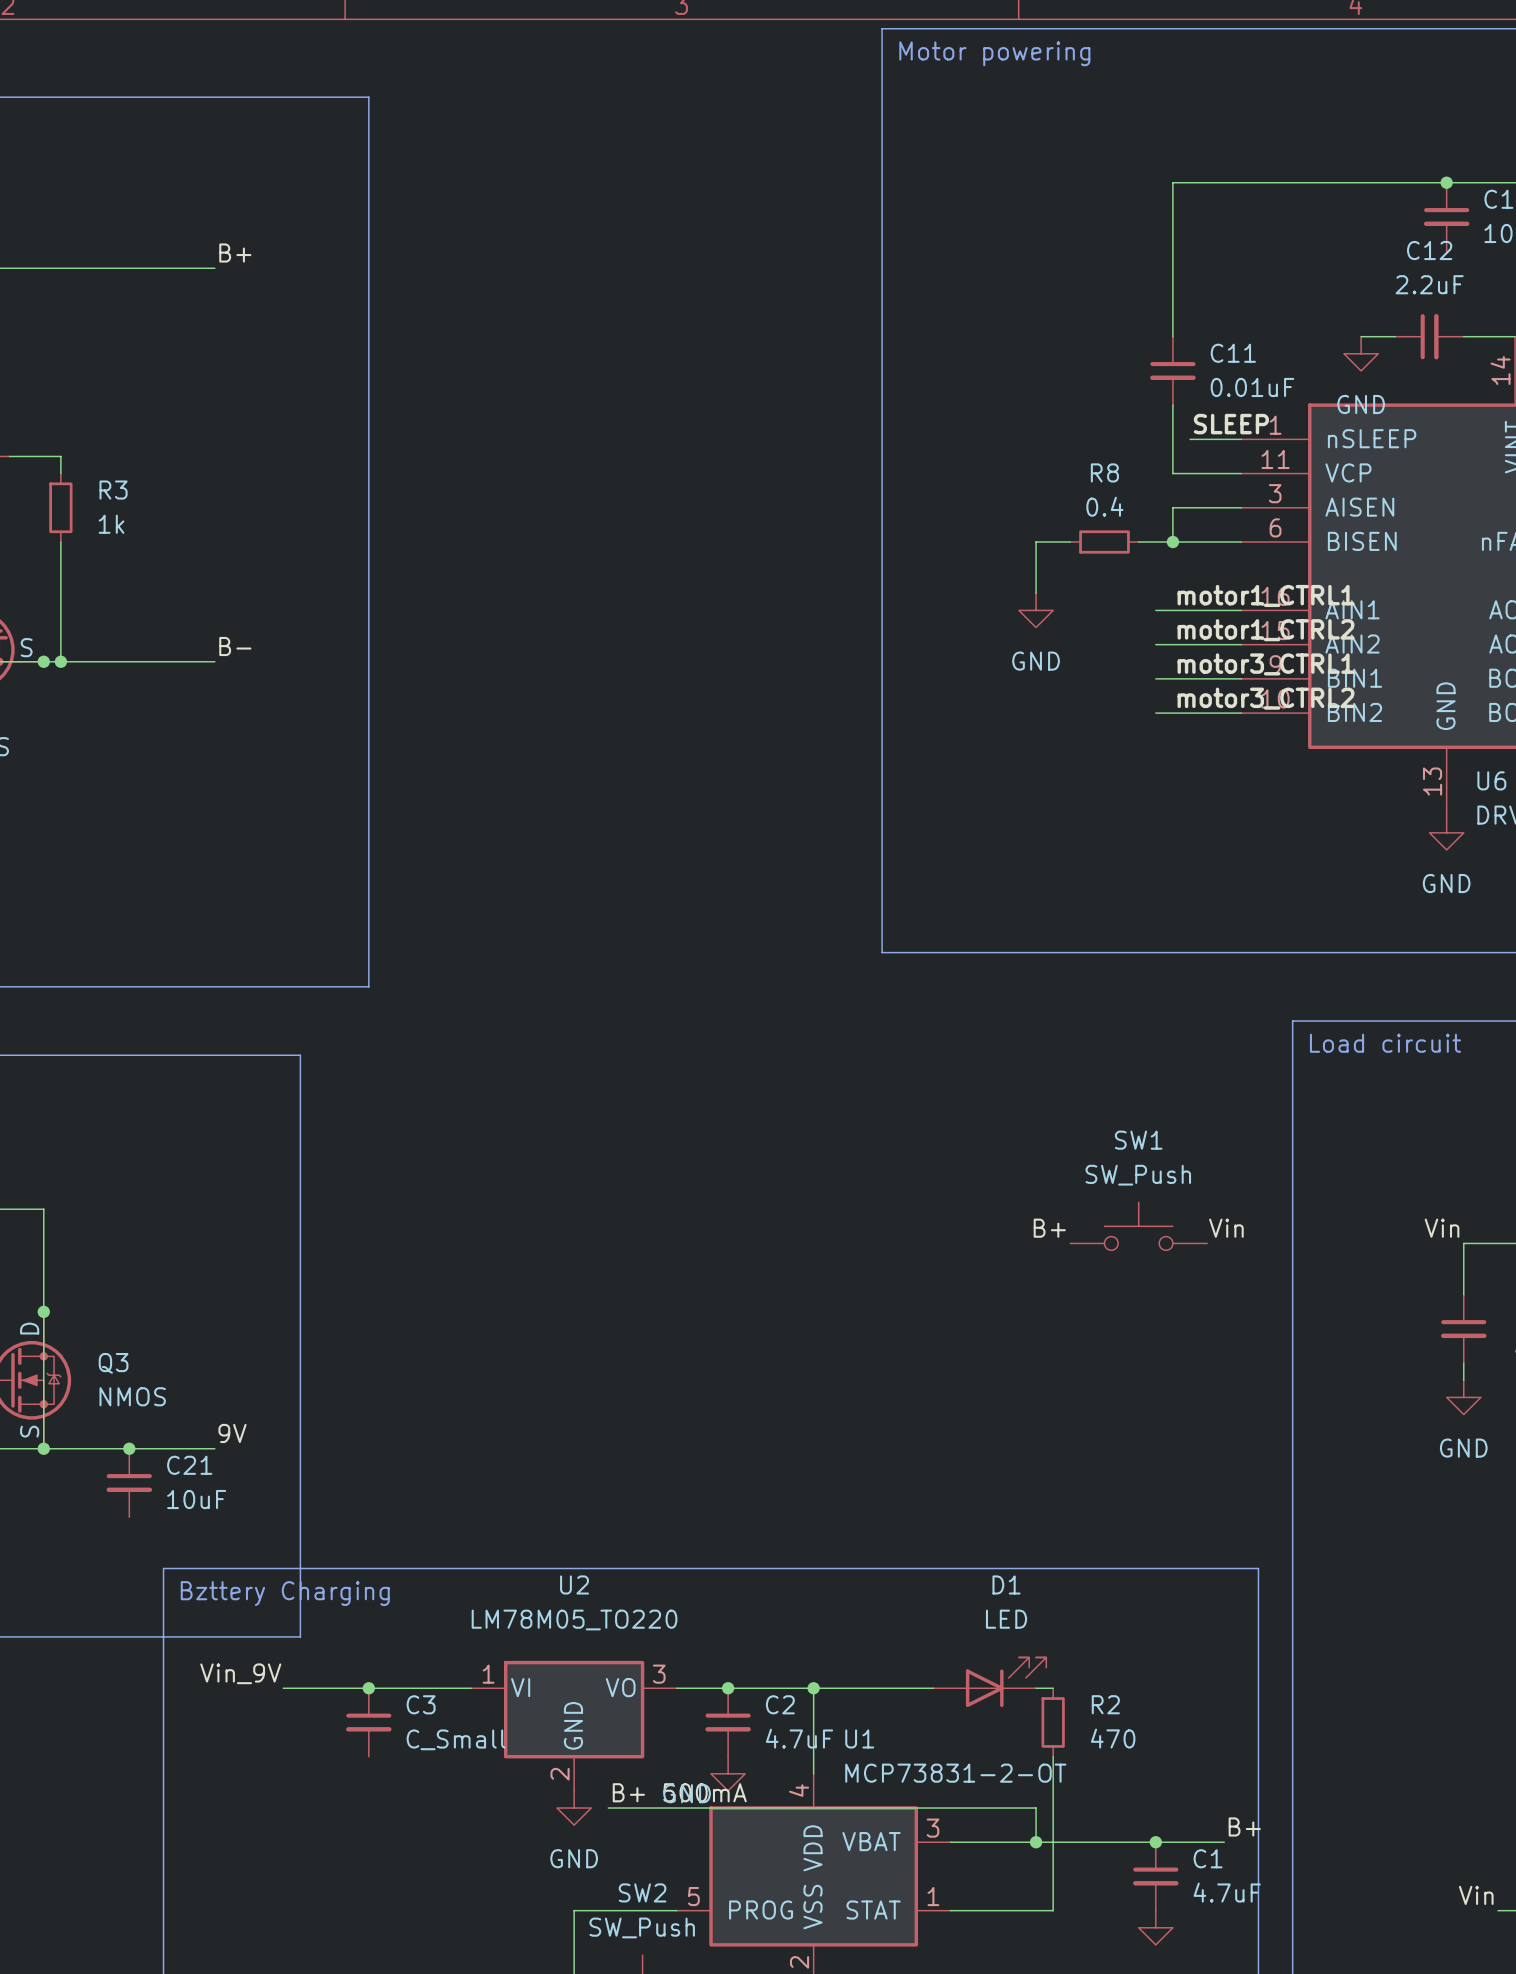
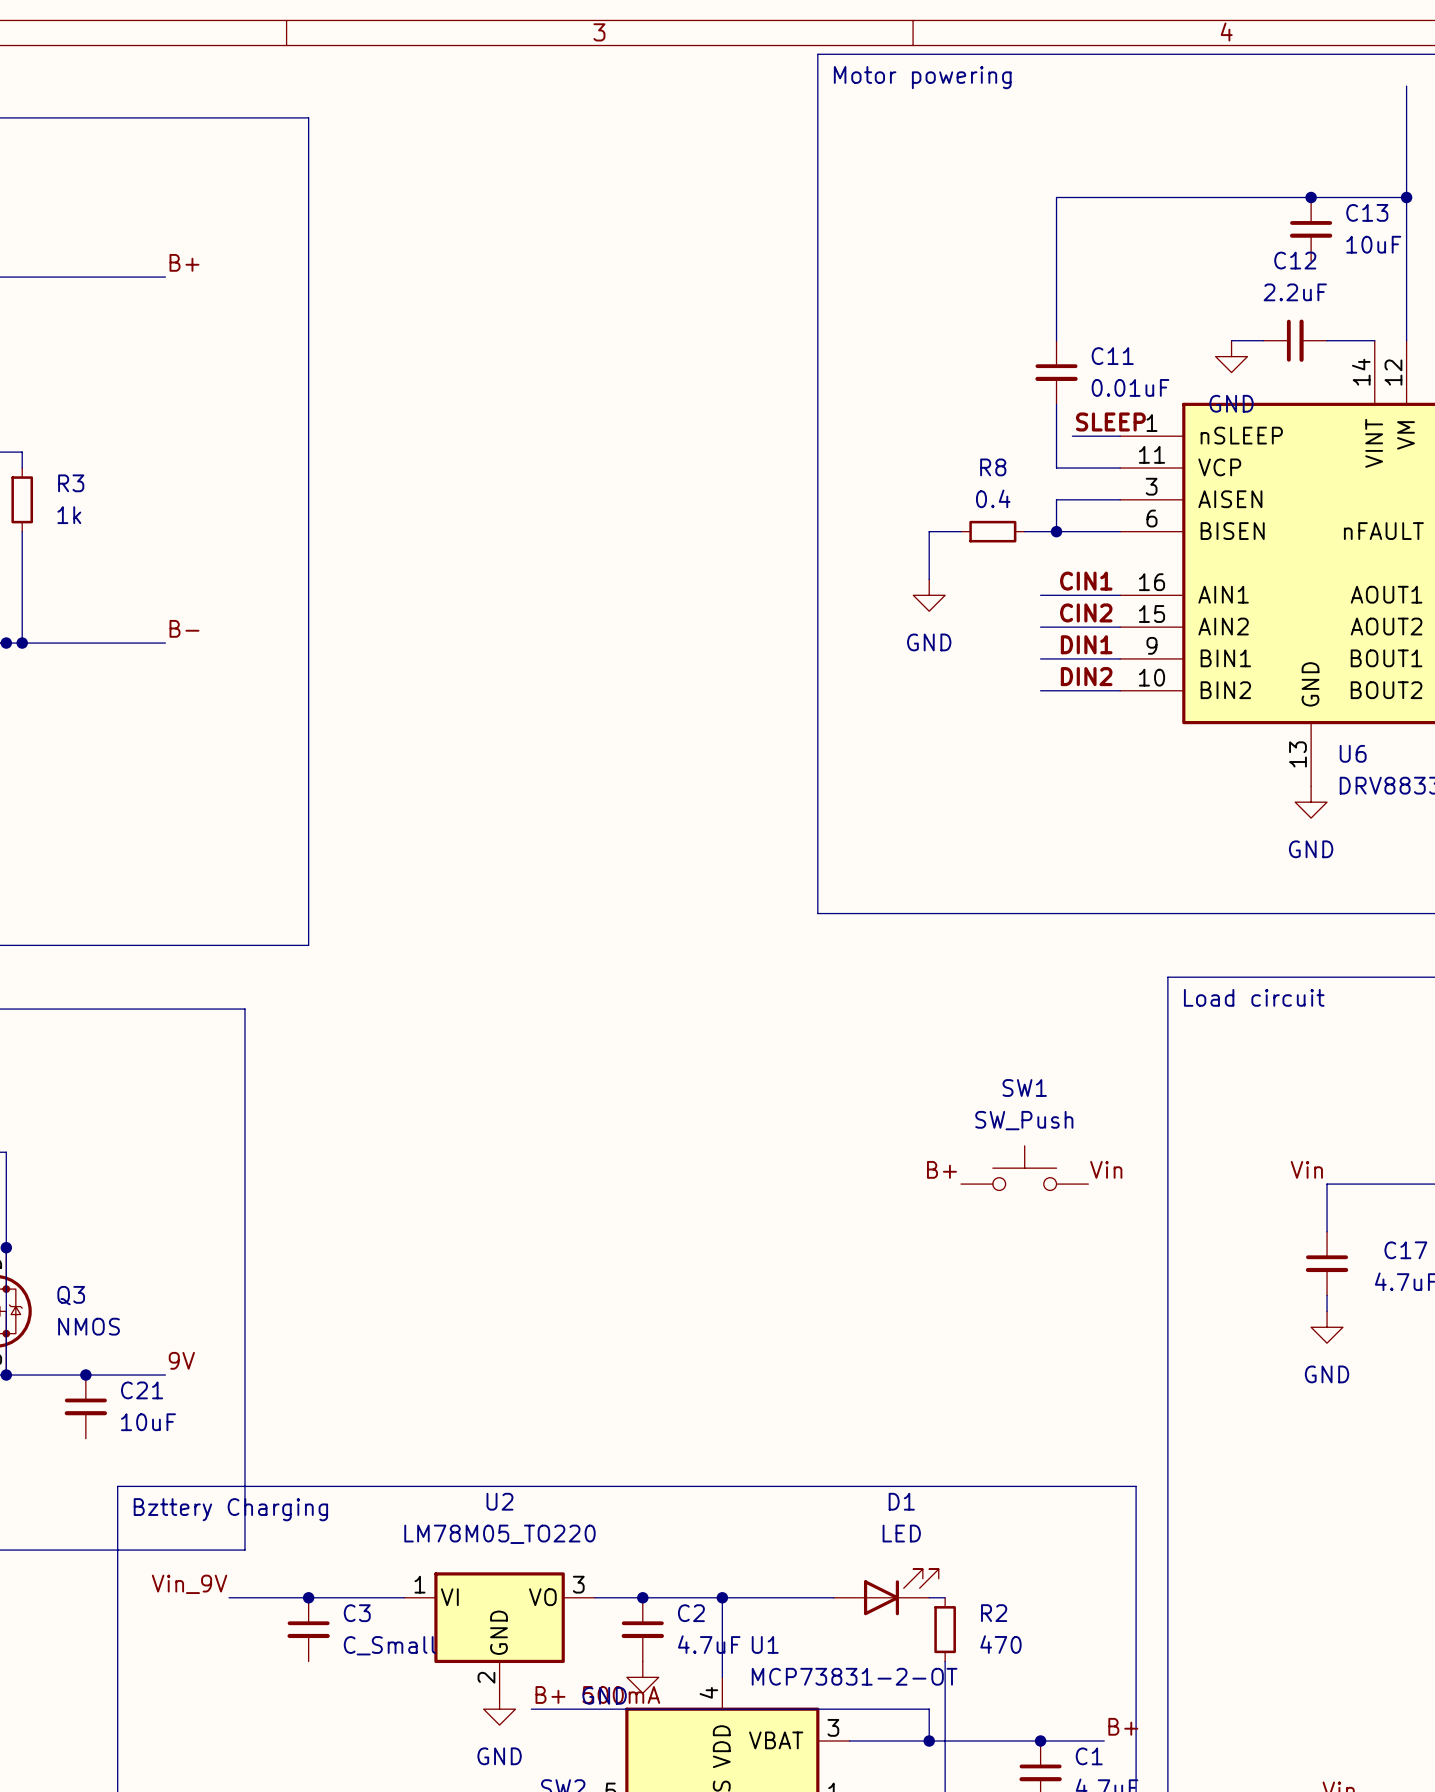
line: (916, 28) (882, 28) (882, 952) (916, 952) -> (817, 54) (817, 913)
text position: Motor powering (994, 53) -> Motor powering (922, 77)
label: motor1_CTRL1 (1266, 595) -> CIN1 (1086, 581)
label: motor1_CTRL2 (1266, 630) -> CIN2 (1086, 612)
label: motor3_CTRL1 (1266, 664) -> DIN1 (1086, 644)
label: motor3_CTRL2 (1266, 698) -> DIN2 (1086, 676)

